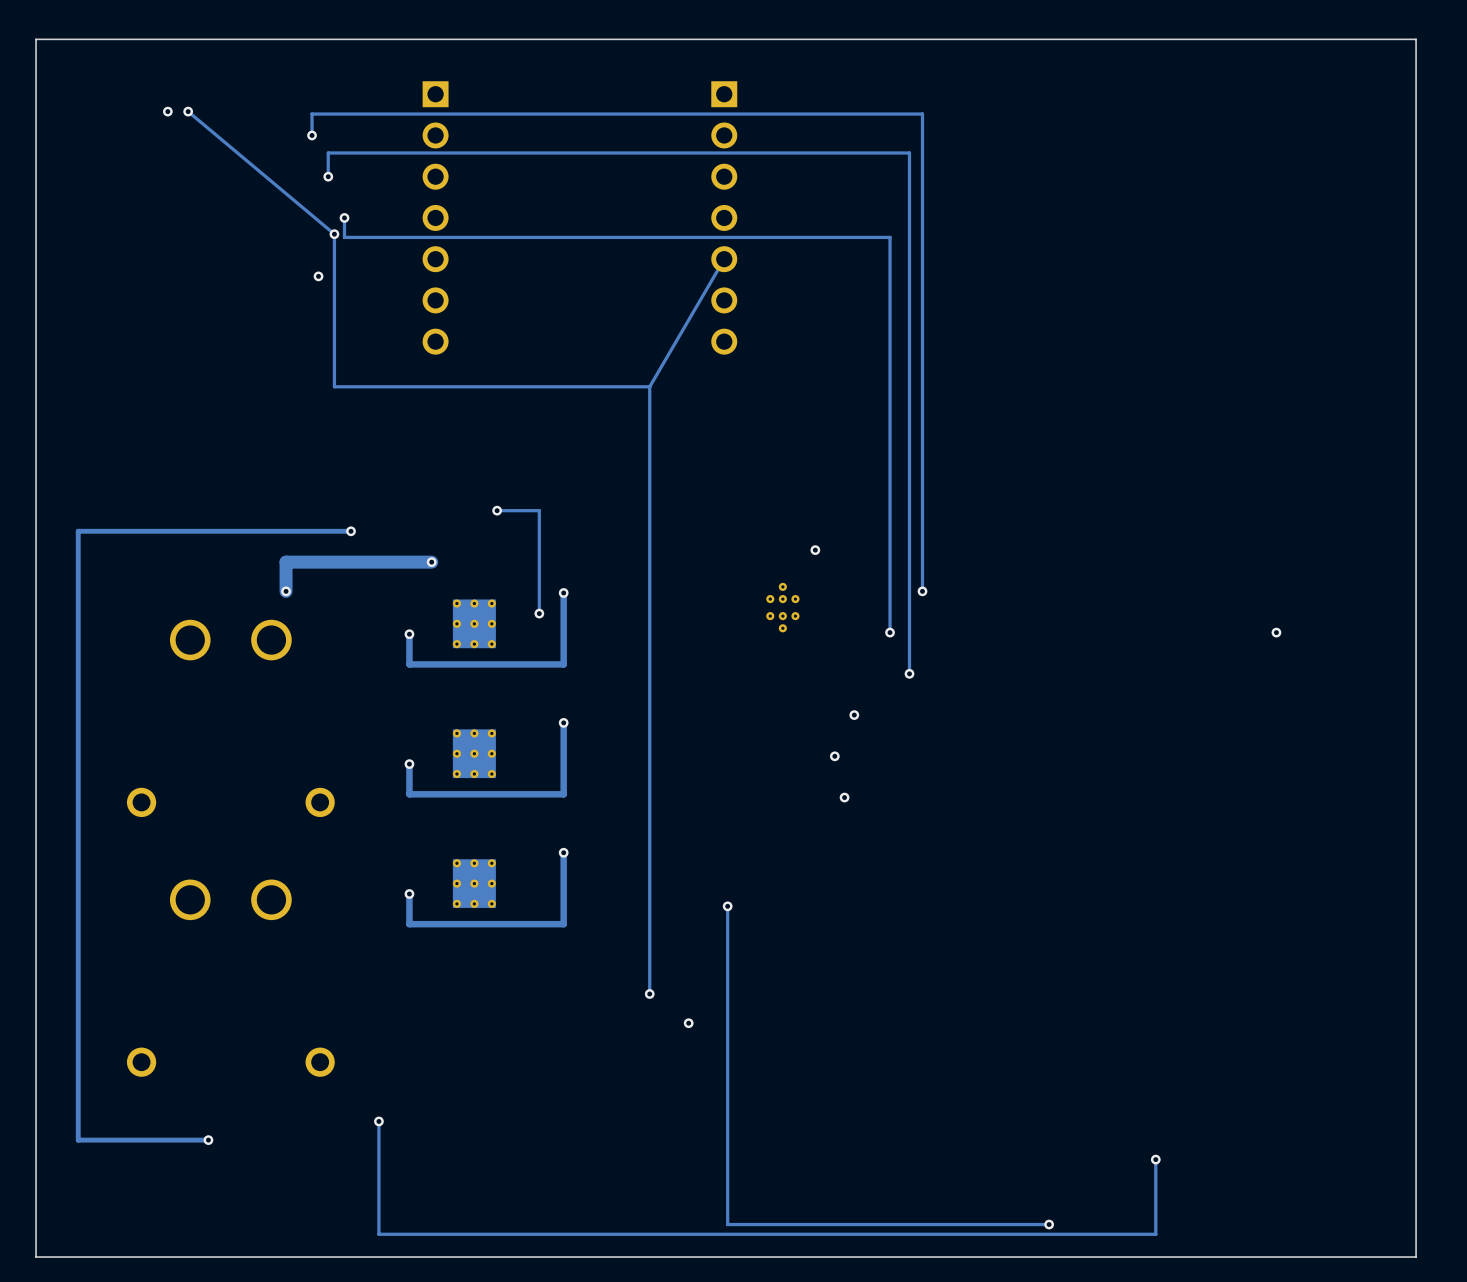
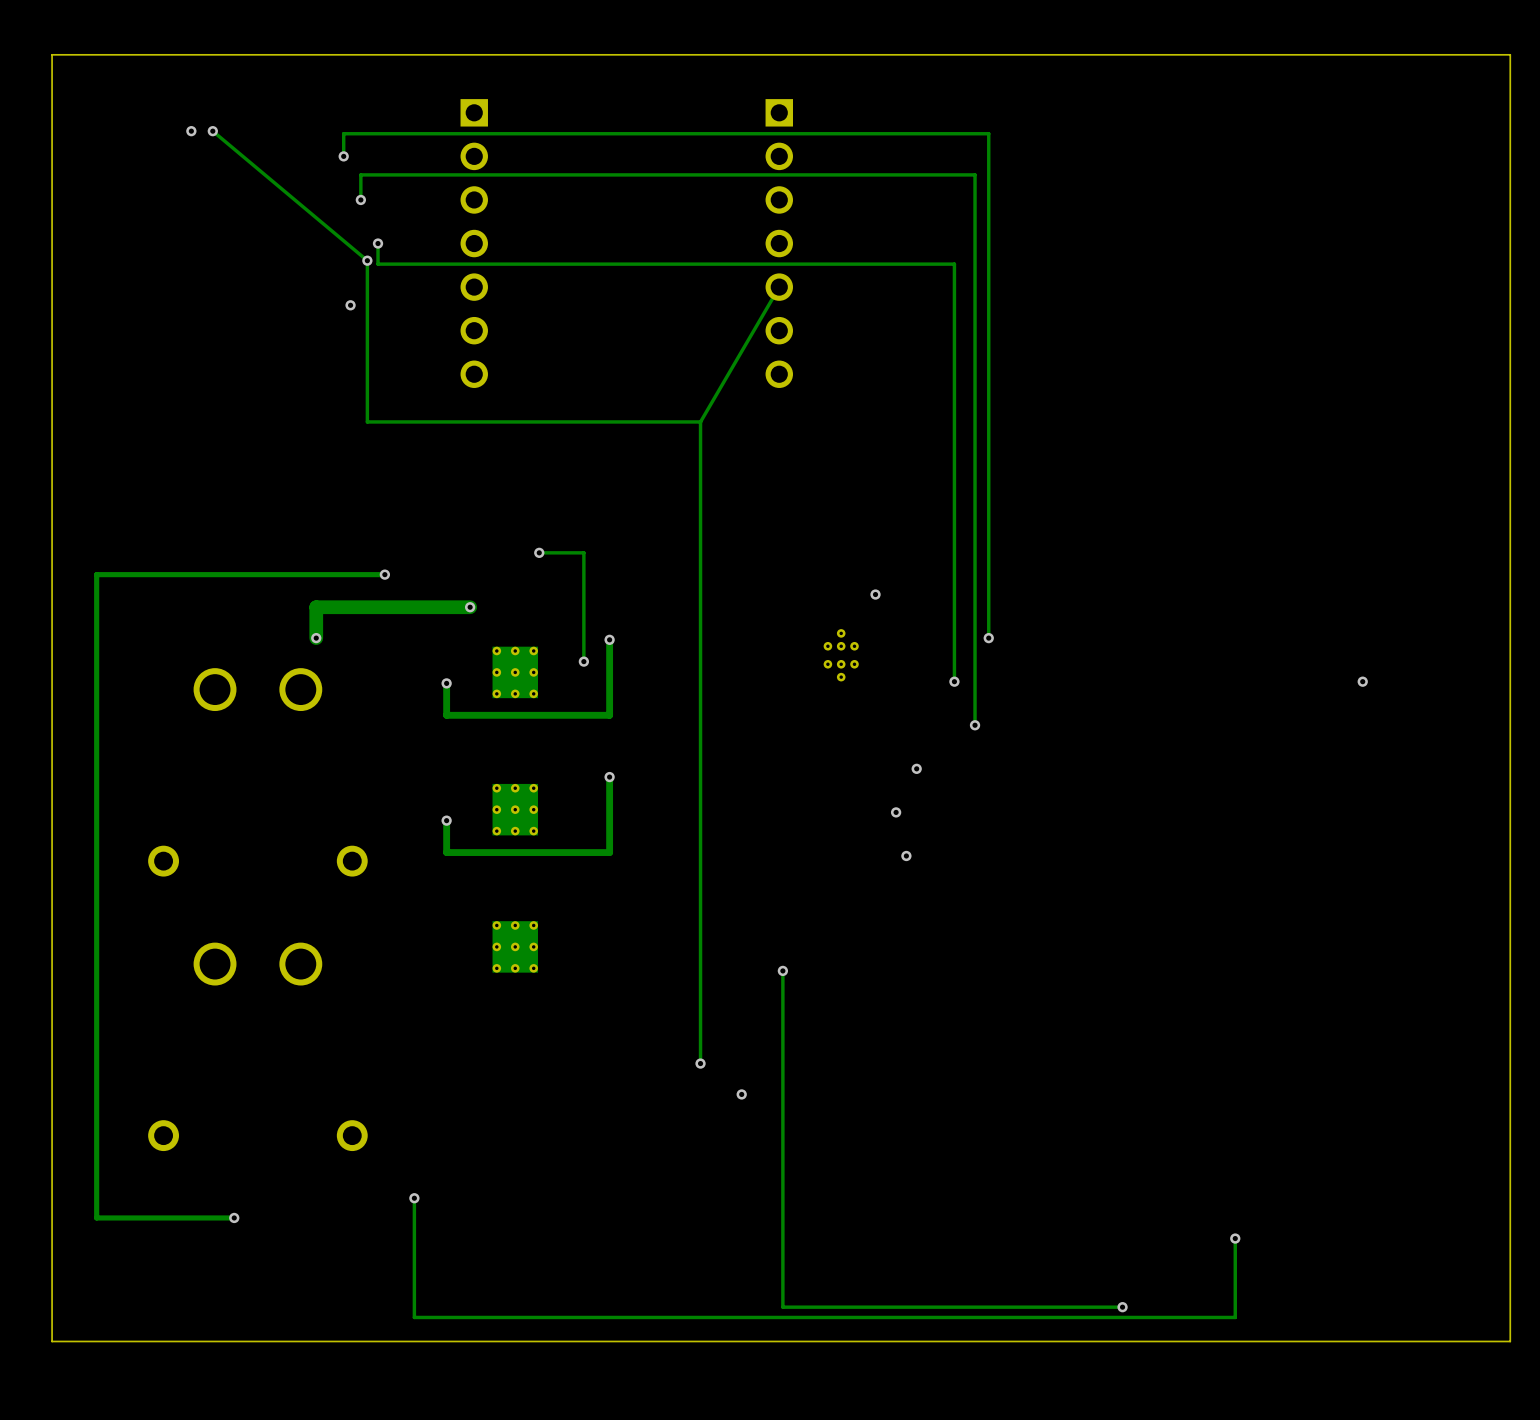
track: (563, 852) (563, 924) (409, 924) (409, 893) -> none
via: (563, 852) -> none
via: (409, 893) -> none

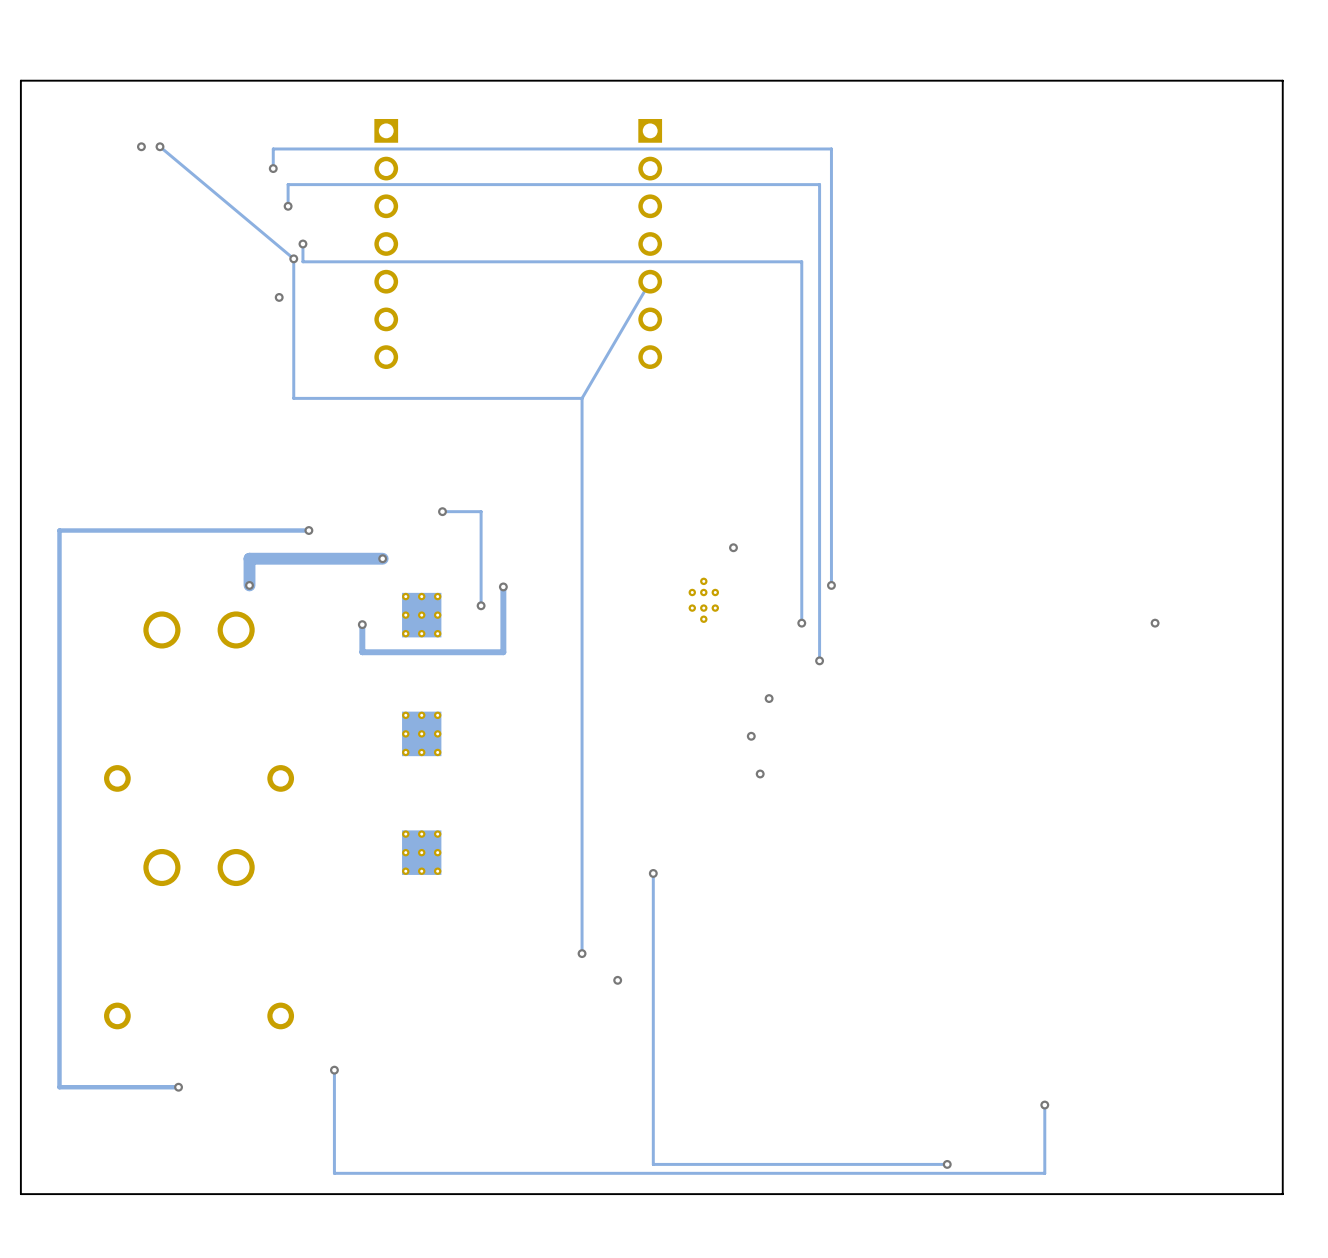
track: (609, 777) (609, 852) (446, 852) (446, 820) -> none
via: (609, 777) -> none
via: (446, 820) -> none

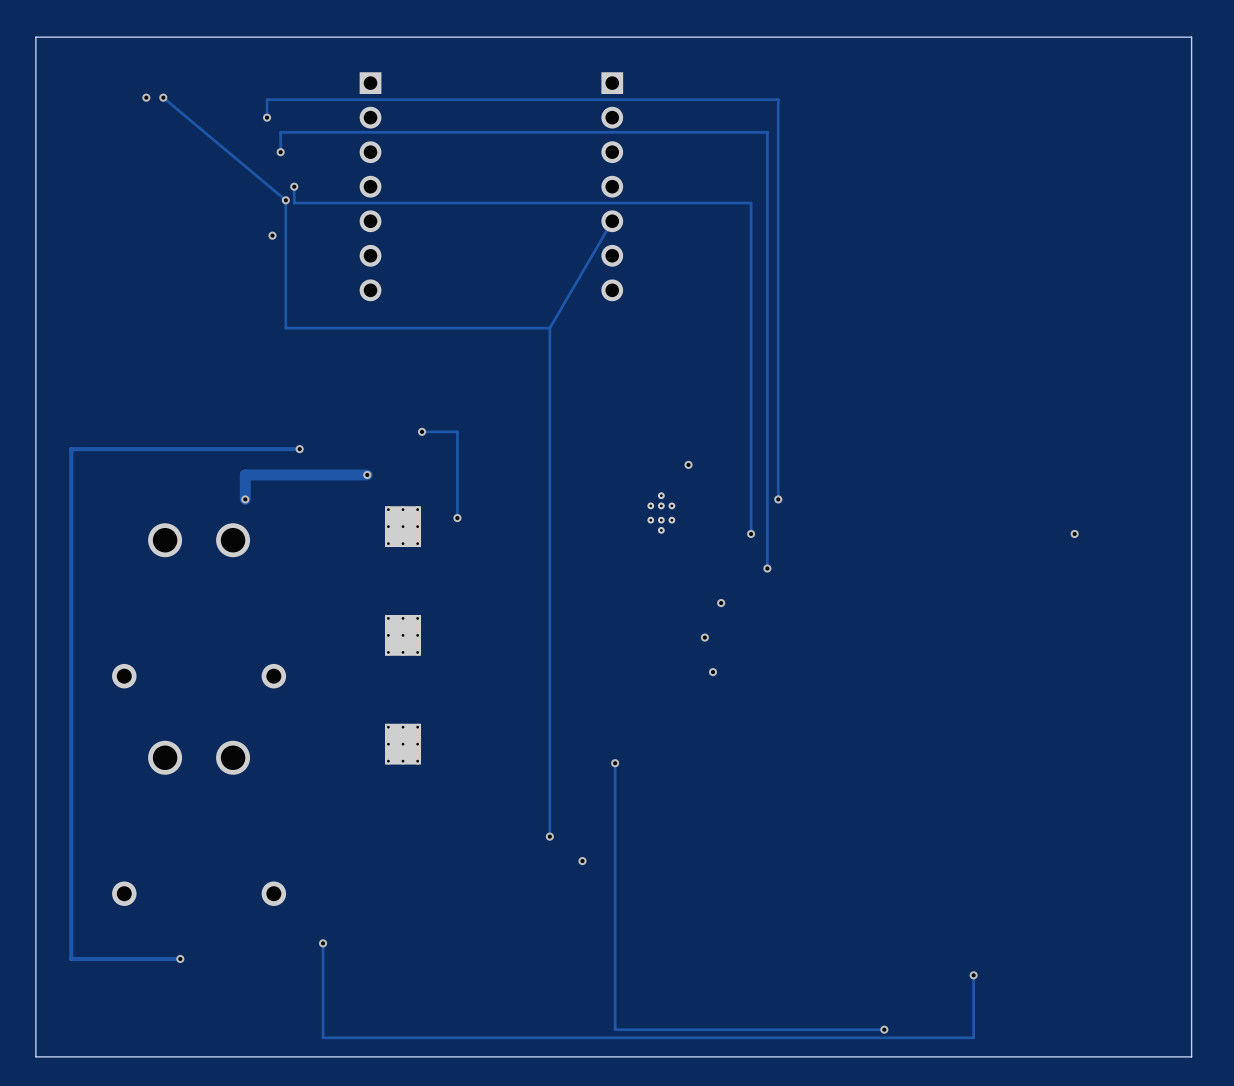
track: (503, 586) (503, 652) (362, 652) (362, 624) -> none
via: (503, 586) -> none
via: (362, 624) -> none

